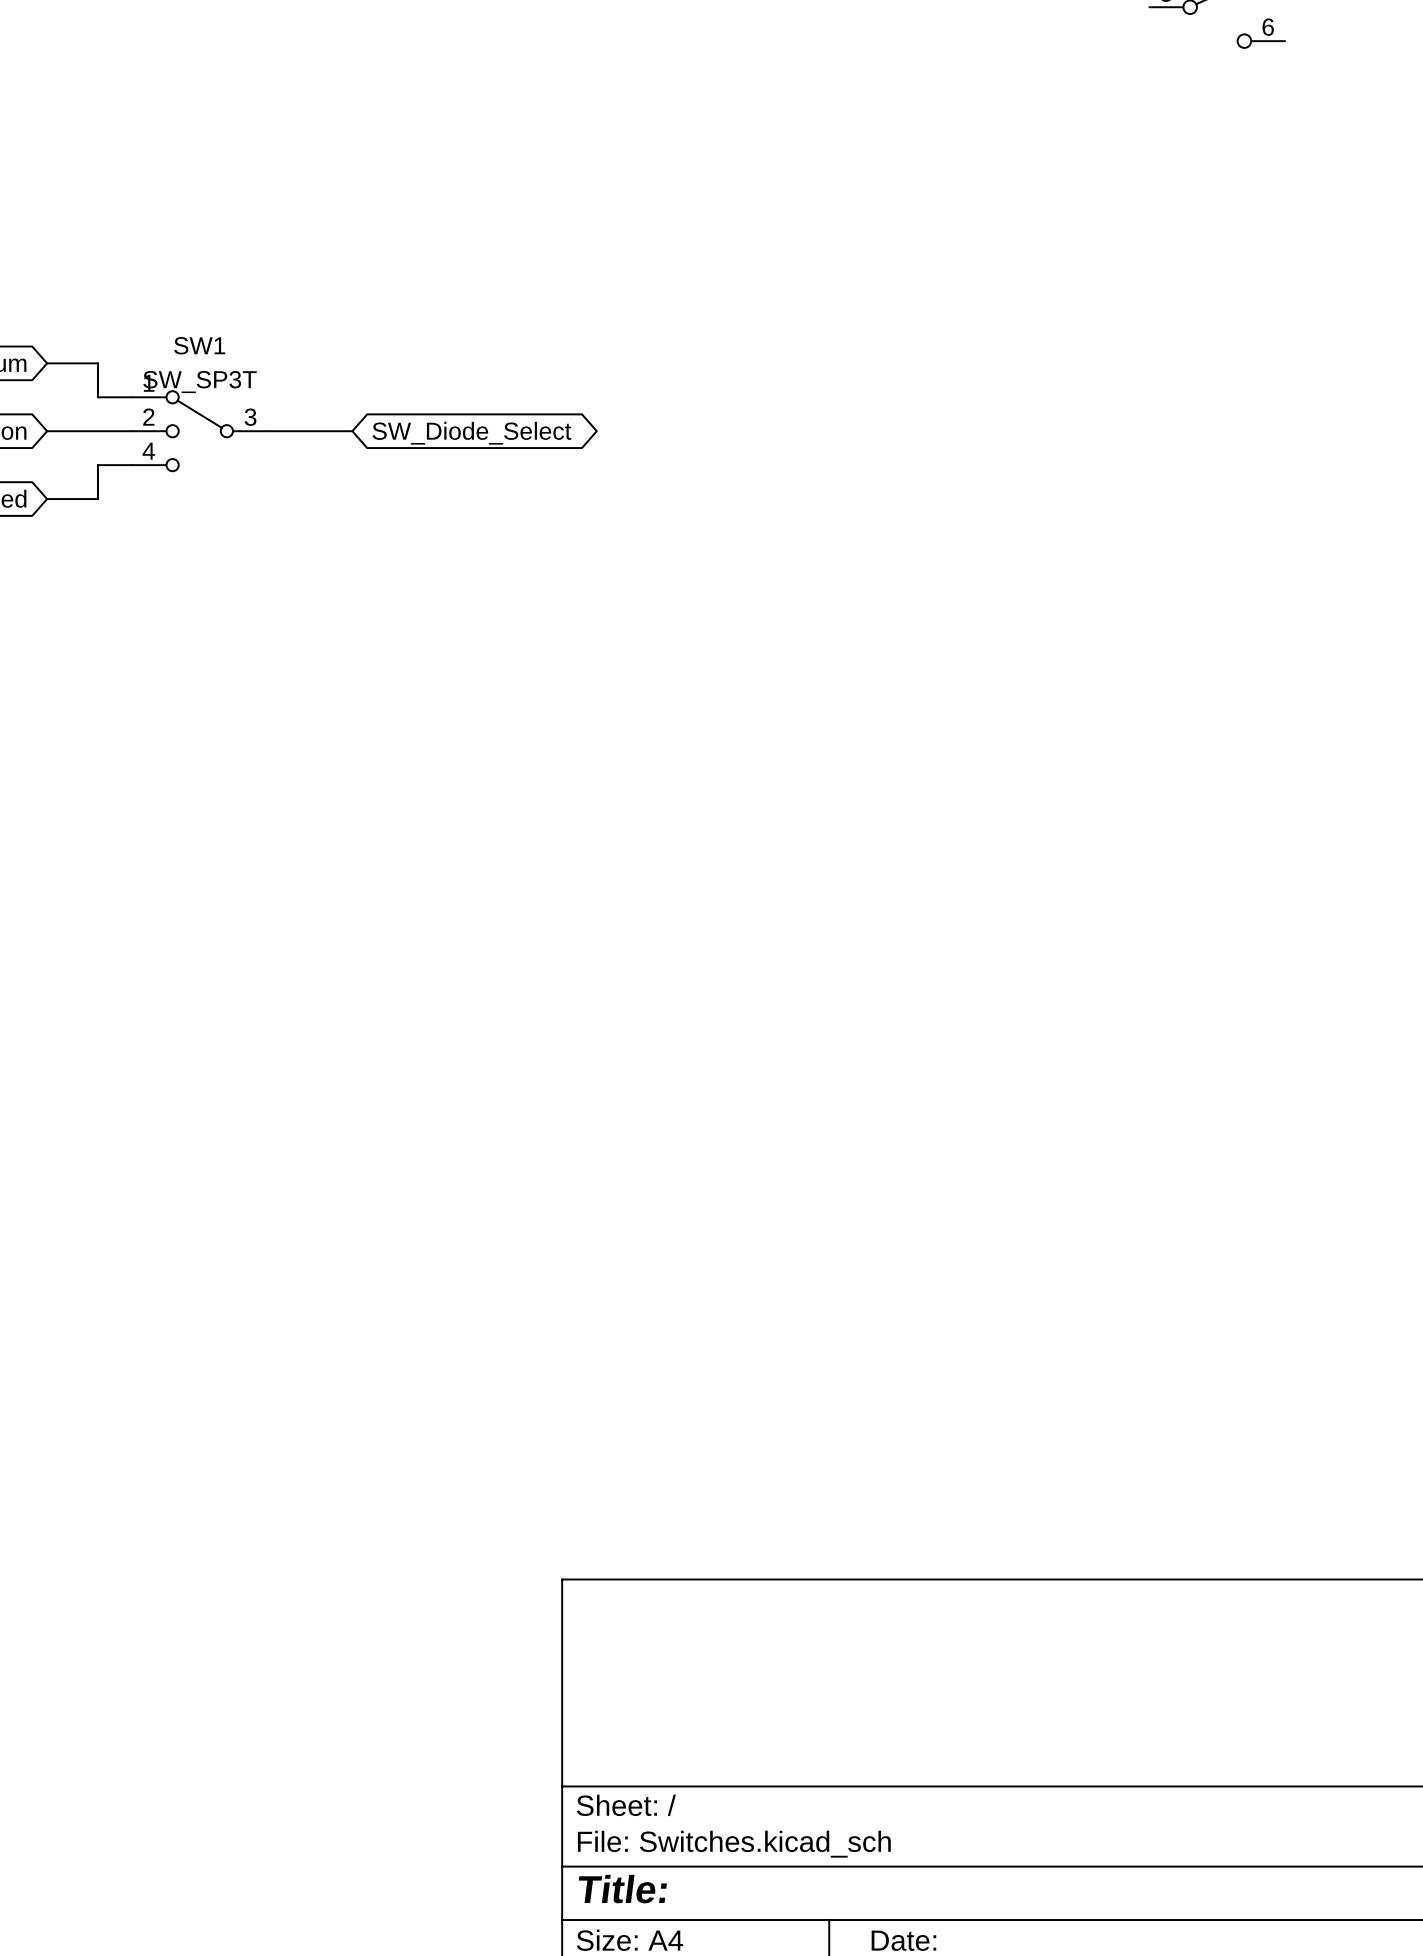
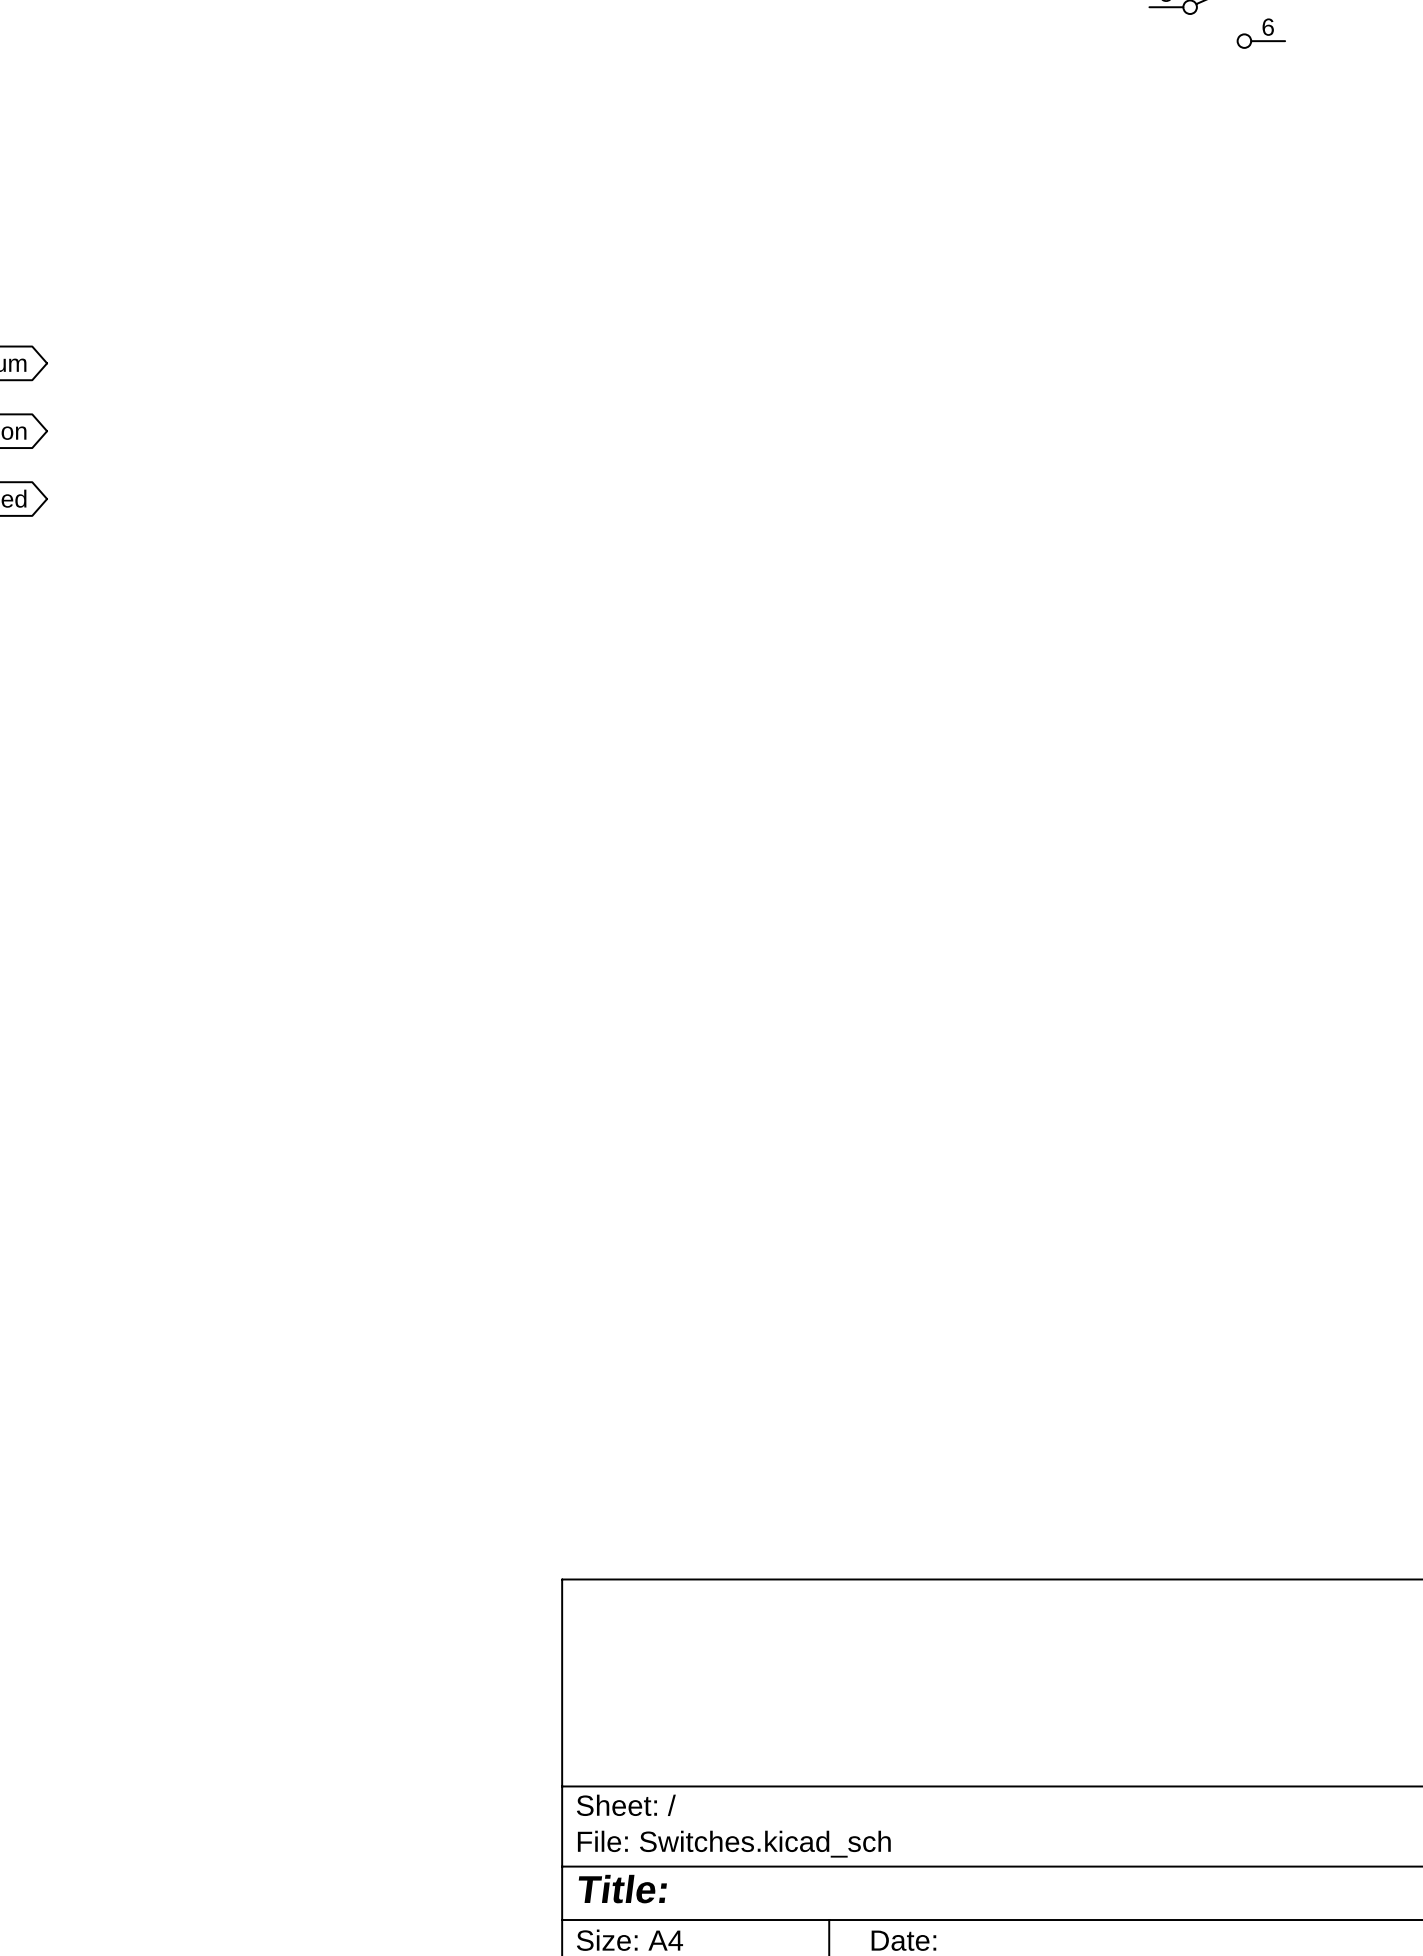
wire: (47, 363) (97, 363) (97, 397) (131, 397) -> none
wire: (47, 431) (131, 431) -> none
SW1: SW_SP3T (199, 431) -> none
wire: (267, 431) (352, 431) -> none
global label: SW_Diode_Select (471, 433) -> none
wire: (131, 465) (97, 465) (97, 499) (47, 499) -> none

